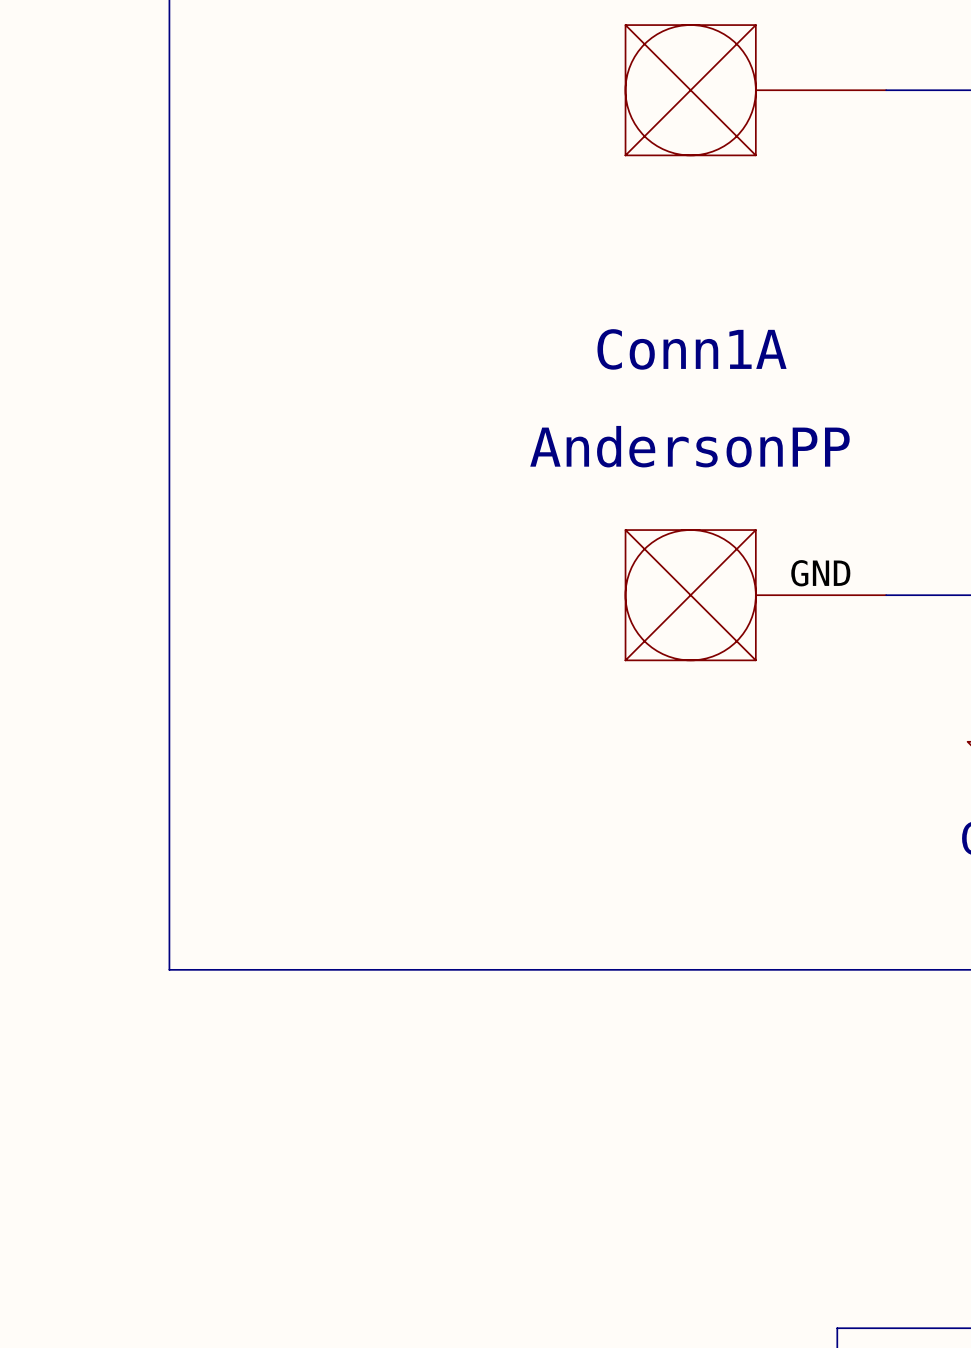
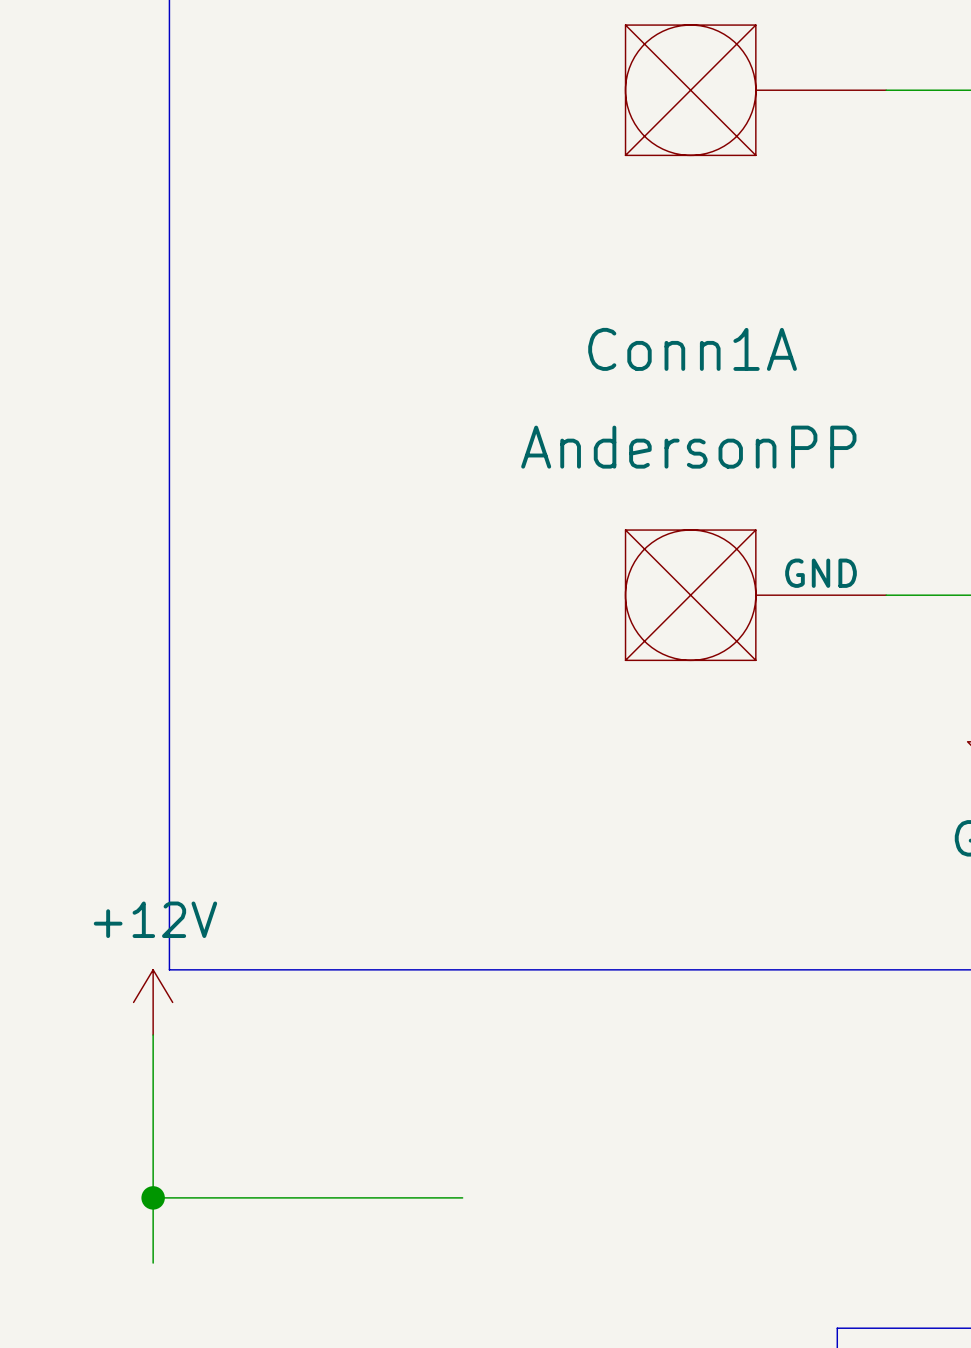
power symbol: none -> +12V (153, 1002)
wire: none -> (153, 1035) (153, 1263)
wire: none -> (153, 1197) (462, 1197)
junction: none -> (153, 1197)

